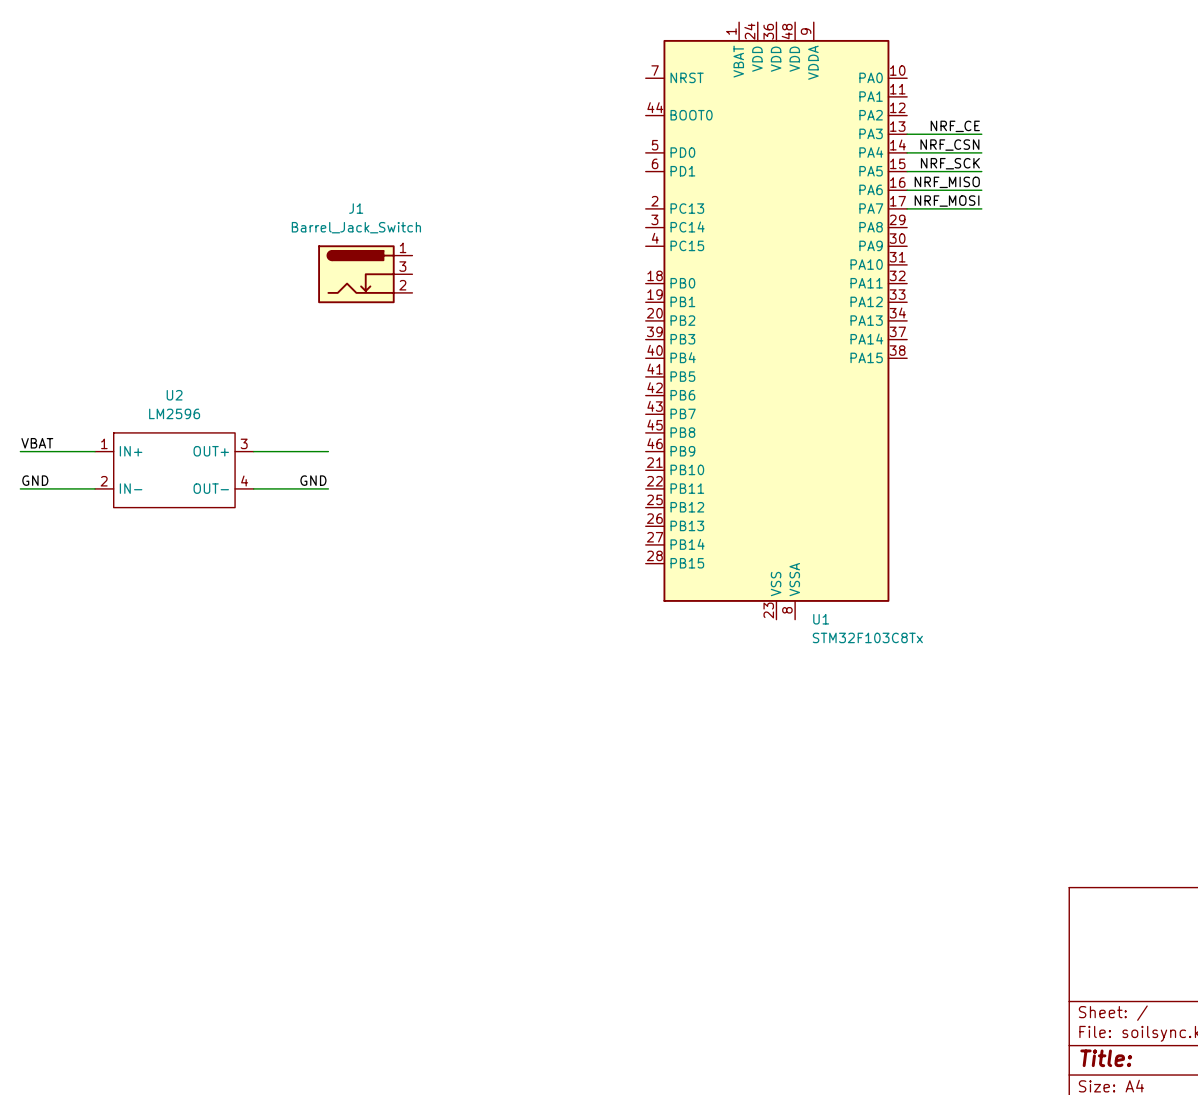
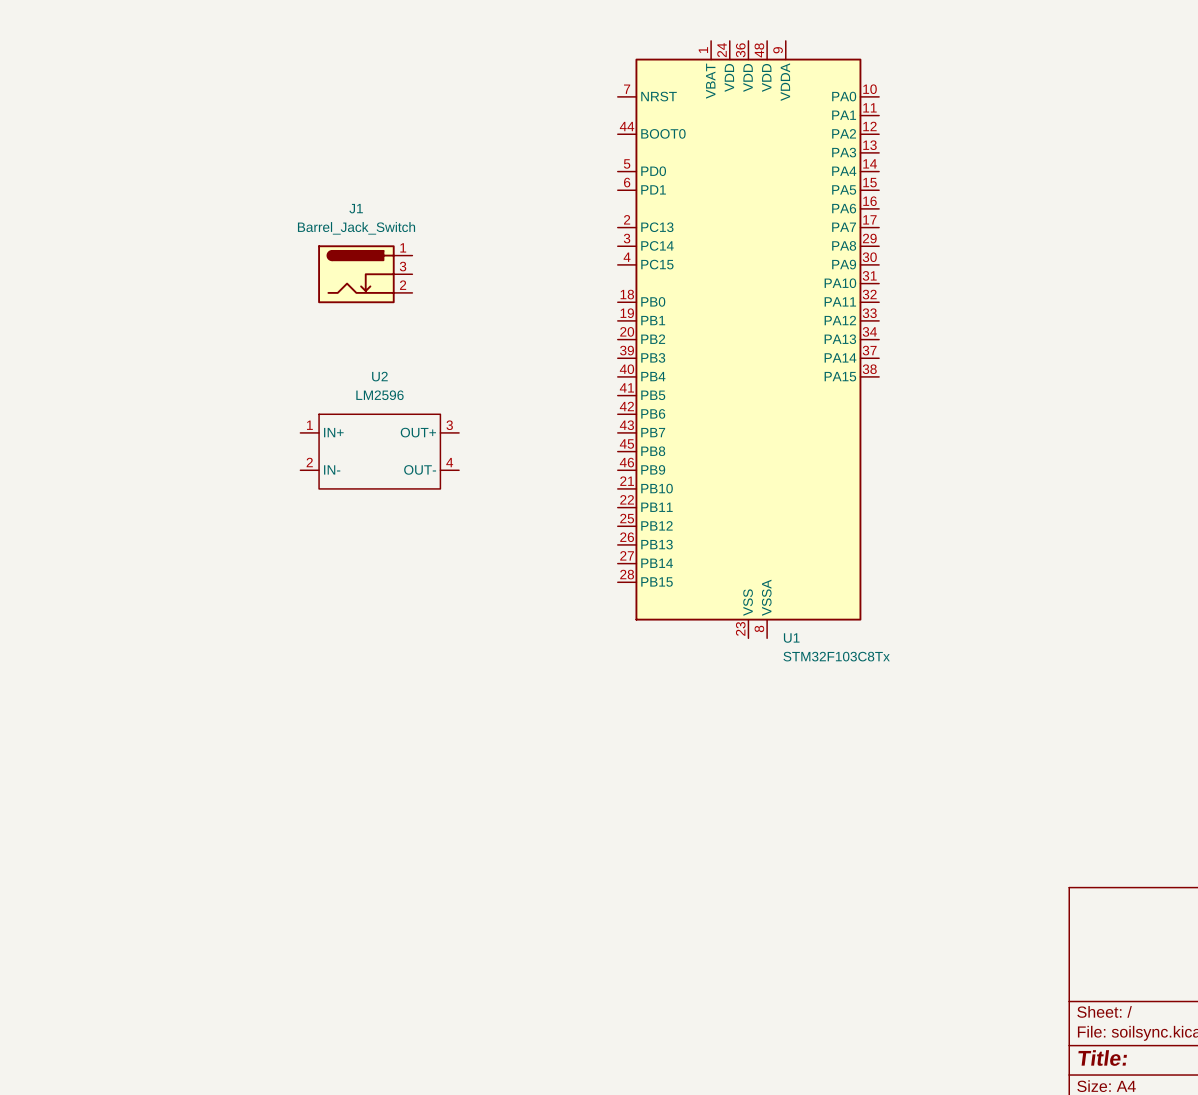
label: NRF_CE (955, 126) -> none
wire: (907, 134) (981, 134) -> none
label: NRF_CSN (949, 145) -> none
wire: (907, 152) (981, 152) -> none
label: NRF_SCK (950, 163) -> none
wire: (907, 171) (981, 171) -> none
label: NRF_MISO (947, 182) -> none
wire: (907, 190) (981, 190) -> none
label: NRF_MOSI (947, 201) -> none
wire: (907, 208) (981, 208) -> none
U1 position: (776, 320) -> (748, 339)
label: VBAT (37, 443) -> none
wire: (20, 451) (95, 451) -> none
wire: (253, 451) (328, 451) -> none
U2 position: (174, 470) -> (379, 451)
label: GND (35, 480) -> none
label: GND (313, 480) -> none
wire: (20, 488) (95, 488) -> none
wire: (253, 488) (328, 488) -> none

